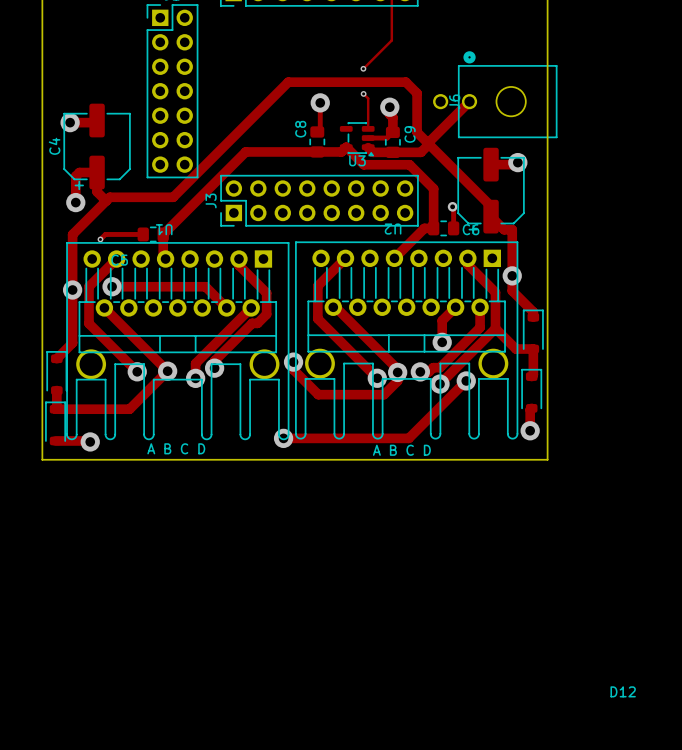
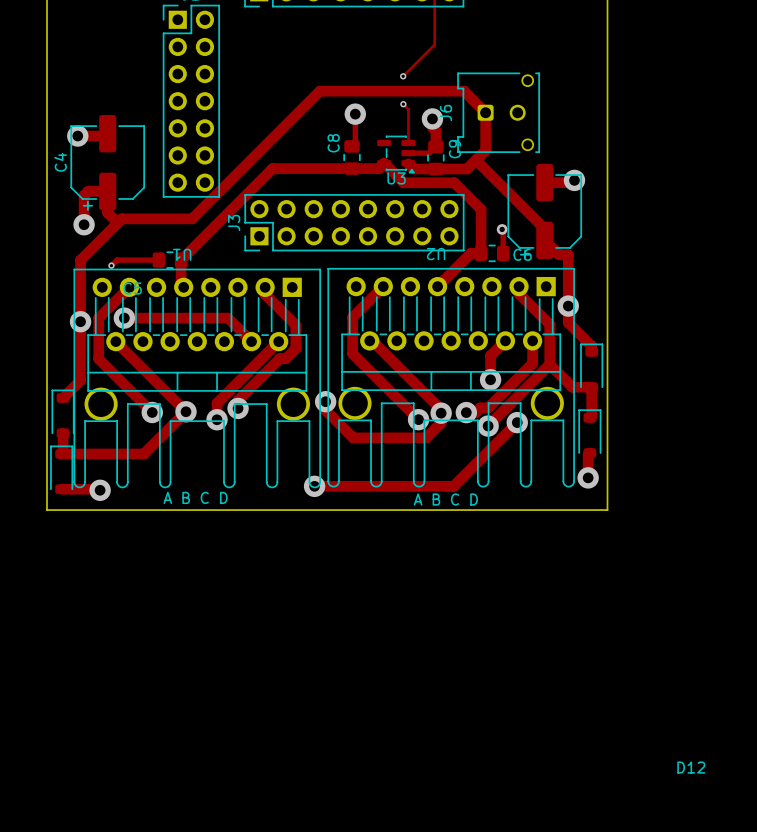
J6 footprint: [433, 51, 558, 139] -> [457, 72, 540, 153]
track: (405, 82) (417, 93) (417, 132) (429, 144) (469, 101) -> (450, 91) (464, 91) (485, 112) (485, 150) (475, 160)

